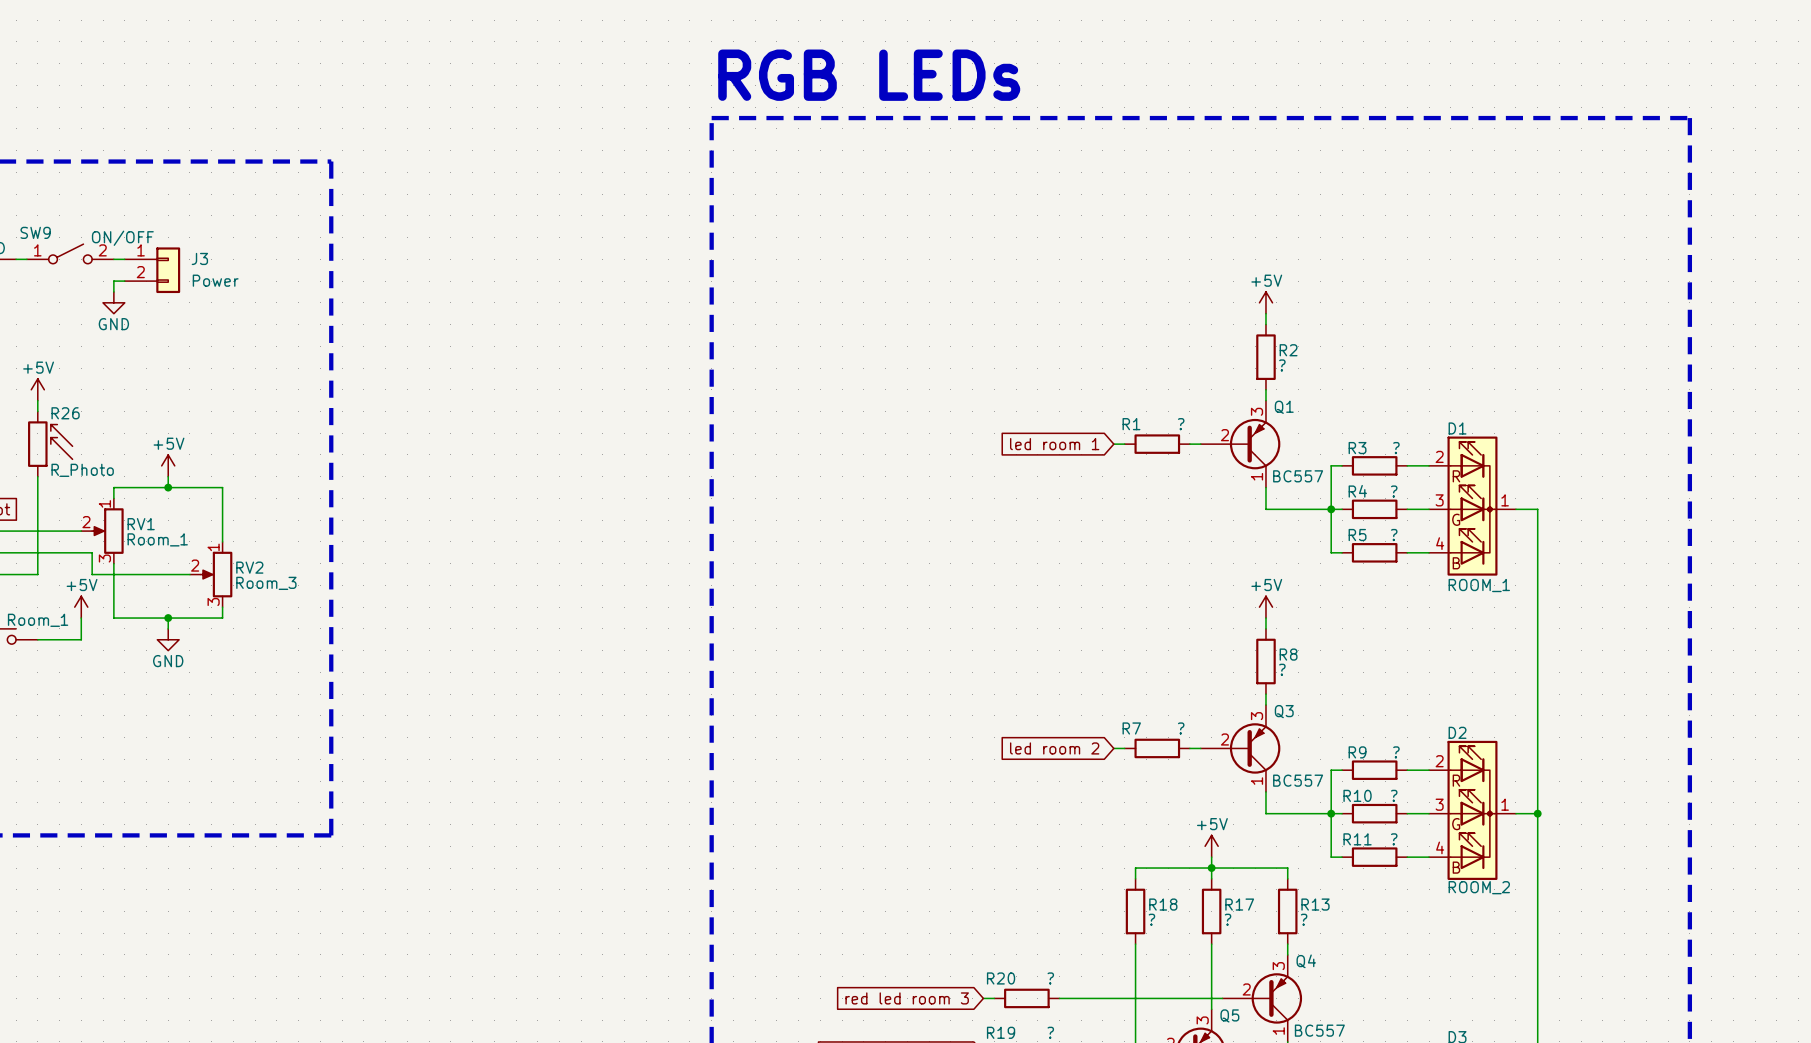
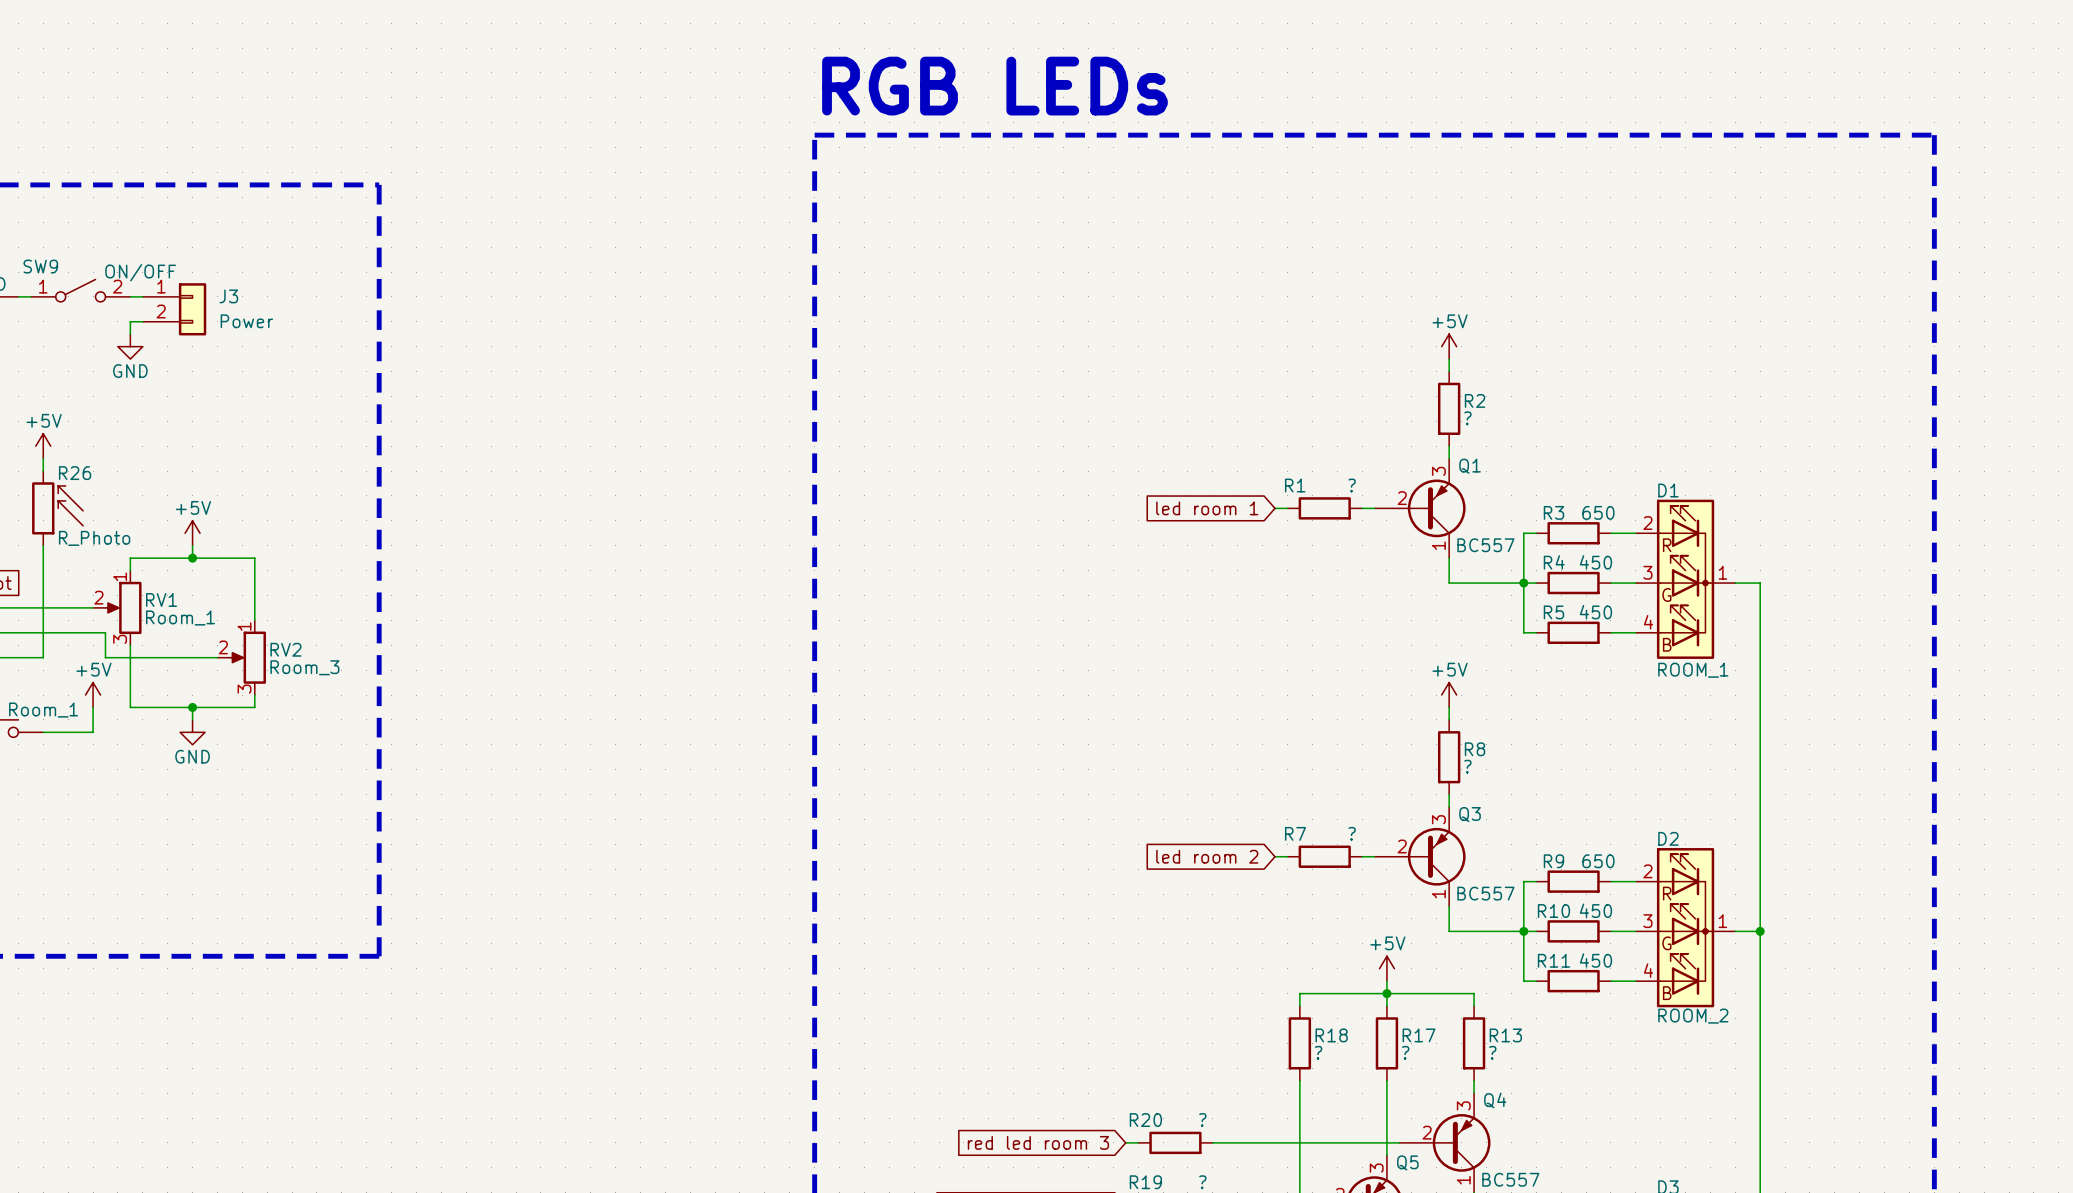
R3 value: ? (1396, 448) -> 650 (1598, 512)
R4 value: ? (1394, 491) -> 450 (1595, 562)
R5 value: ? (1394, 535) -> 450 (1595, 612)
R9 value: ? (1396, 752) -> 650 (1598, 861)
R10 value: ? (1394, 795) -> 450 (1595, 910)
R11 value: ? (1394, 839) -> 450 (1595, 960)

